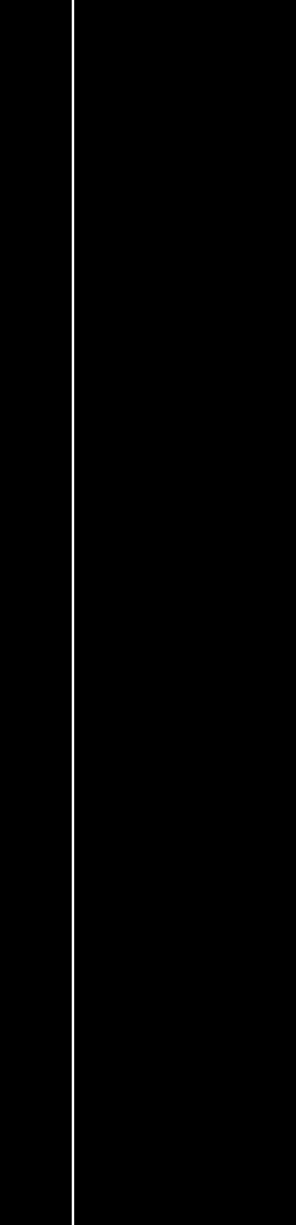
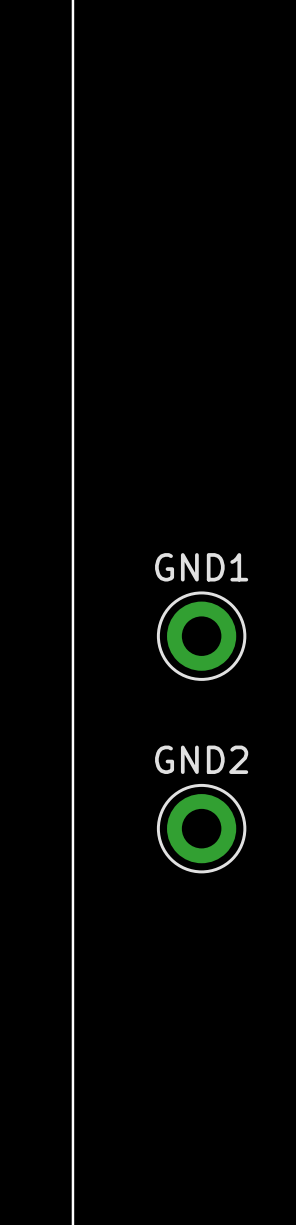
GND1: none -> (201, 636)
GND2: none -> (201, 828)

